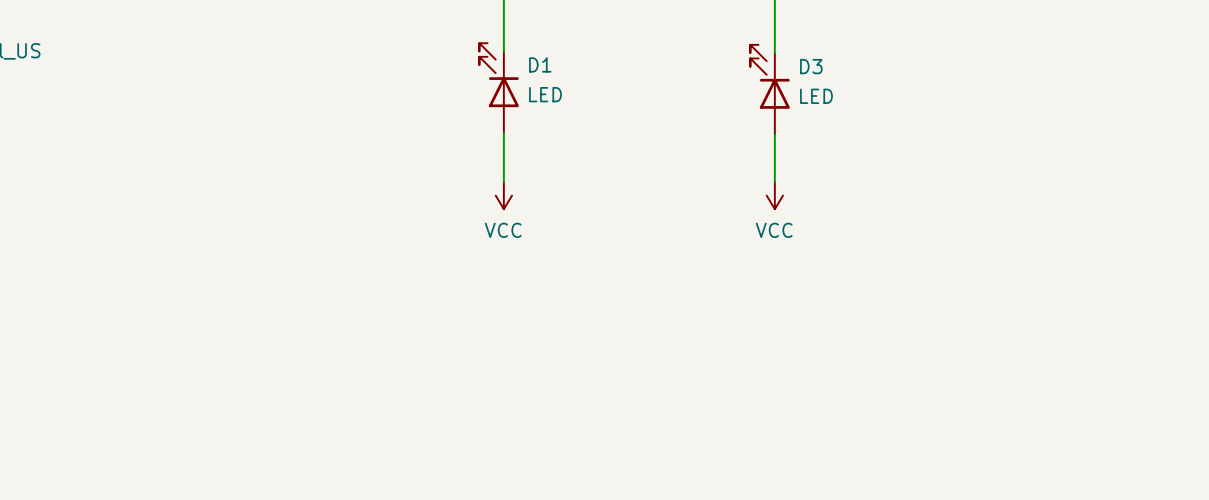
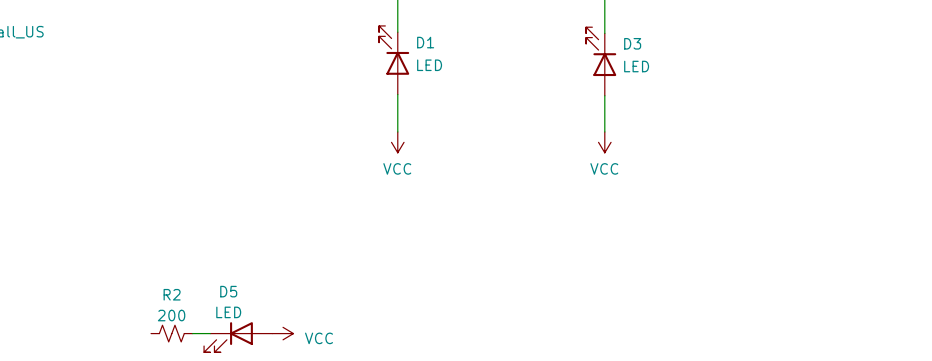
R2: none -> 200 (171, 333)
wire: none -> (192, 333) (210, 333)
power symbol: none -> VCC (283, 333)
D5: none -> LED (238, 337)

